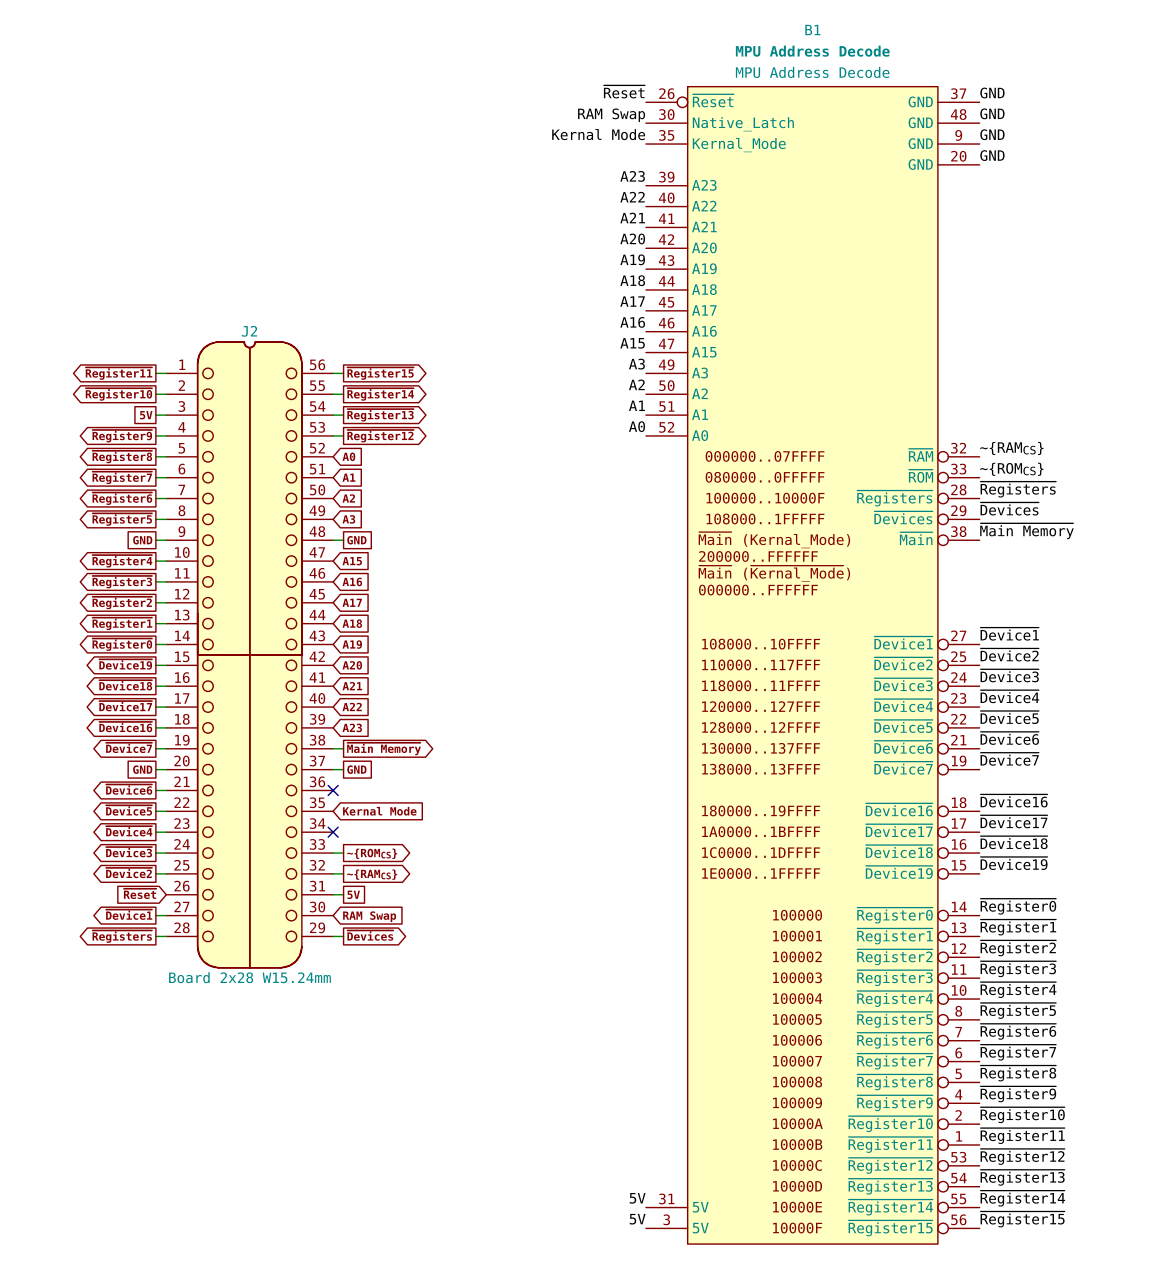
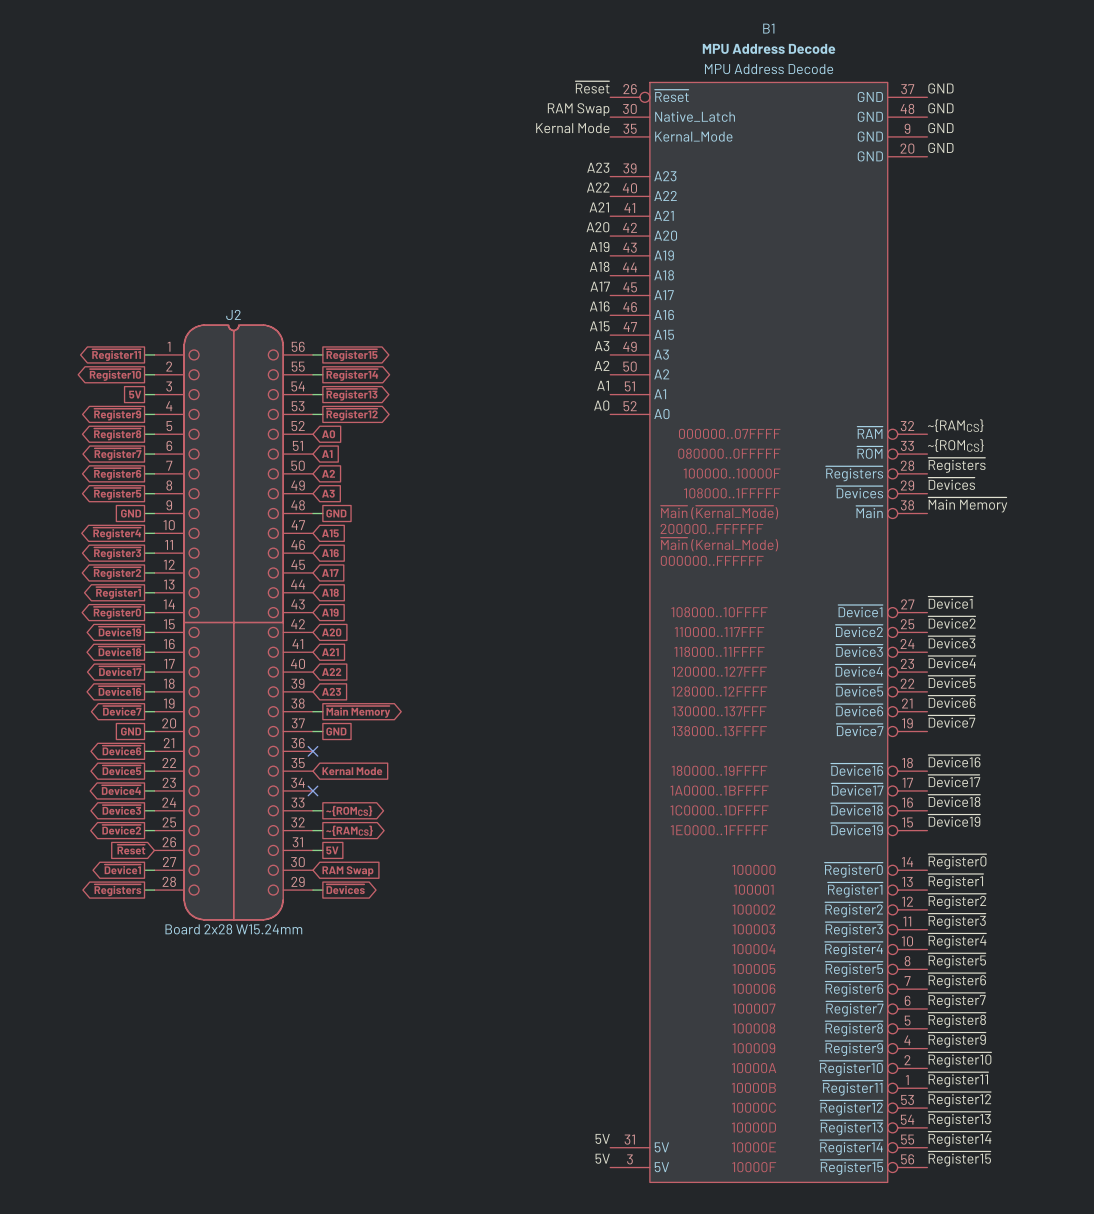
B1 text: ~{Main} (Kernal_Mode) (774, 540) -> ~{Main} (~{Kernal_Mode}) (719, 512)
B1 text: ~{Main} (~{Kernal_Mode}) (774, 573) -> ~{Main} (Kernal_Mode) (719, 544)

